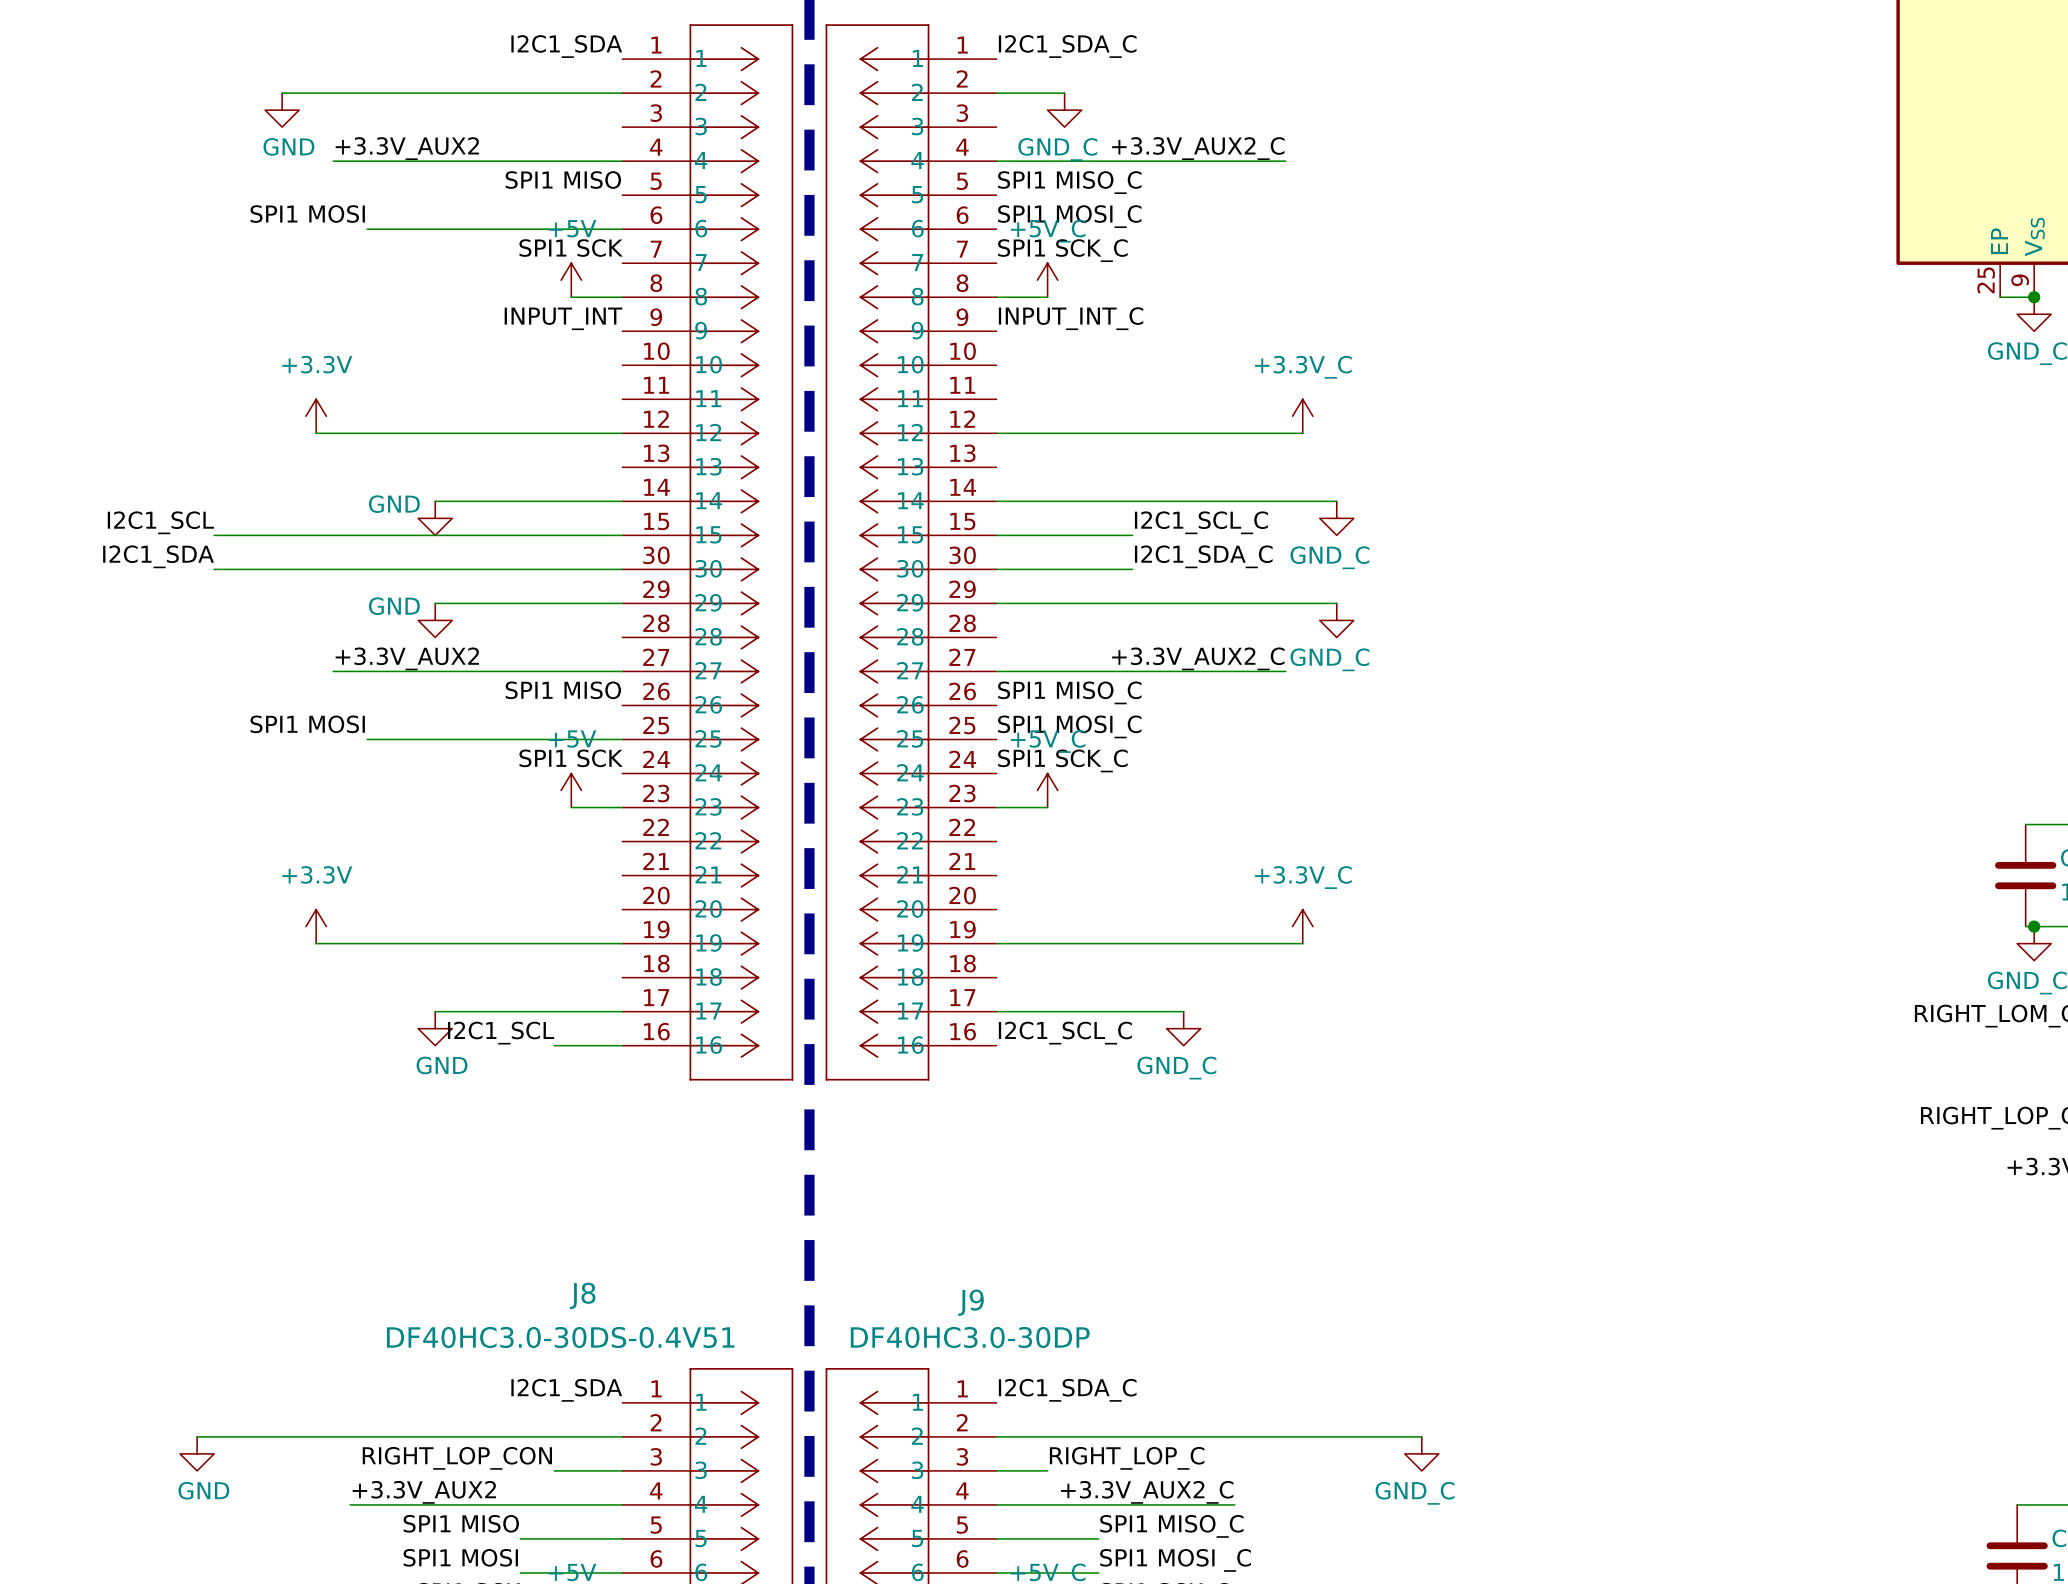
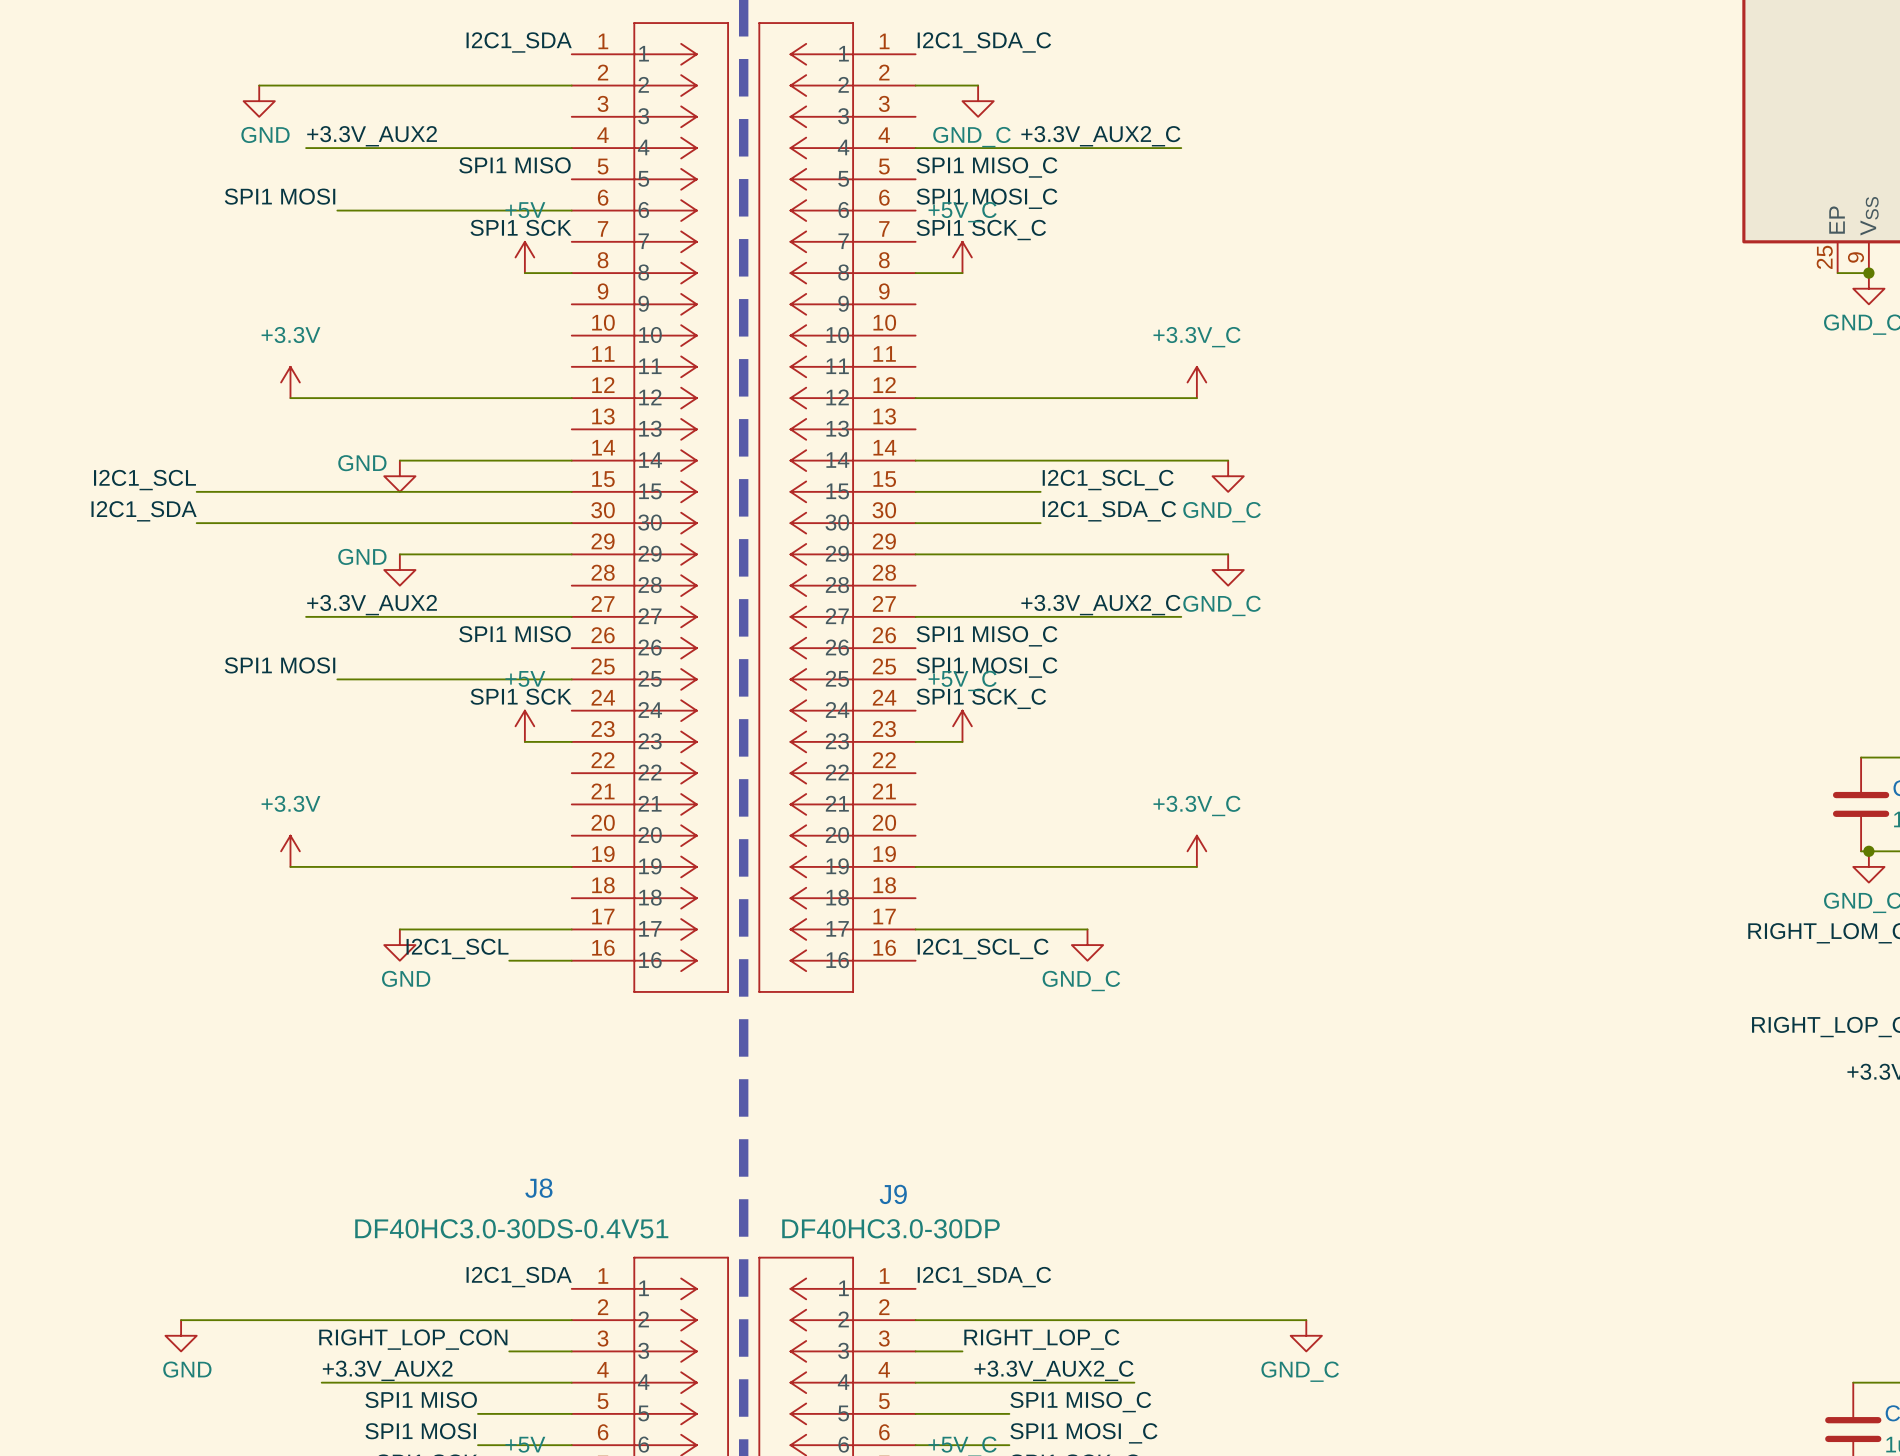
label: INPUT_INT (563, 318) -> none
label: INPUT_INT_C (1071, 318) -> none

